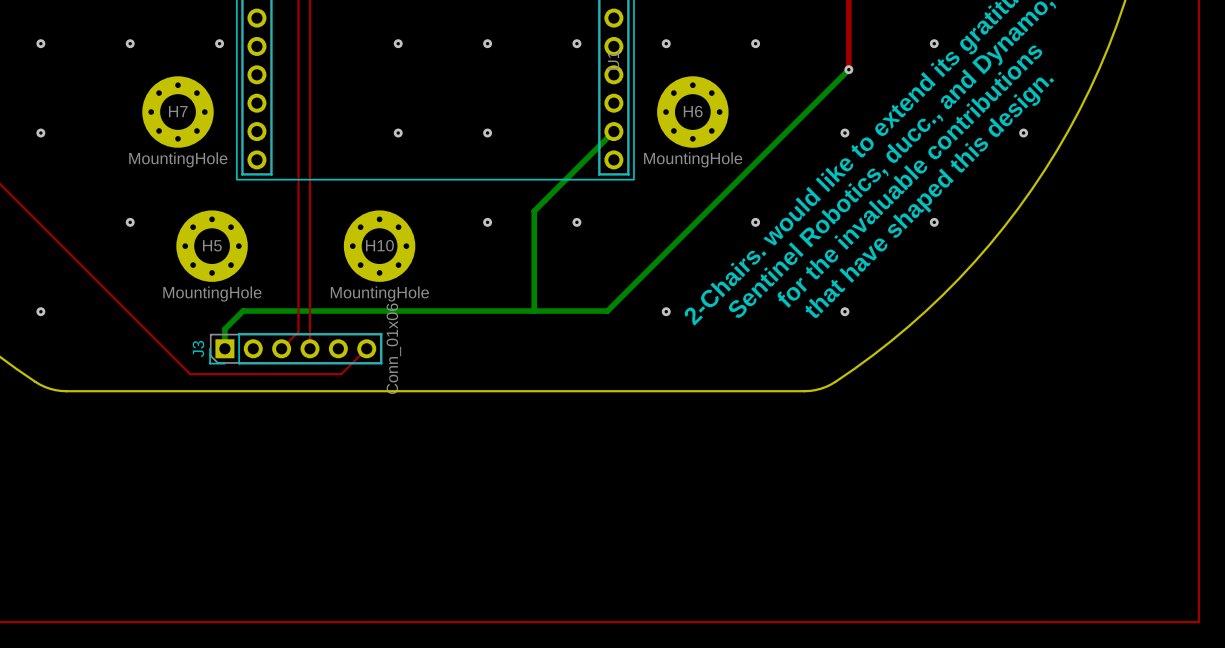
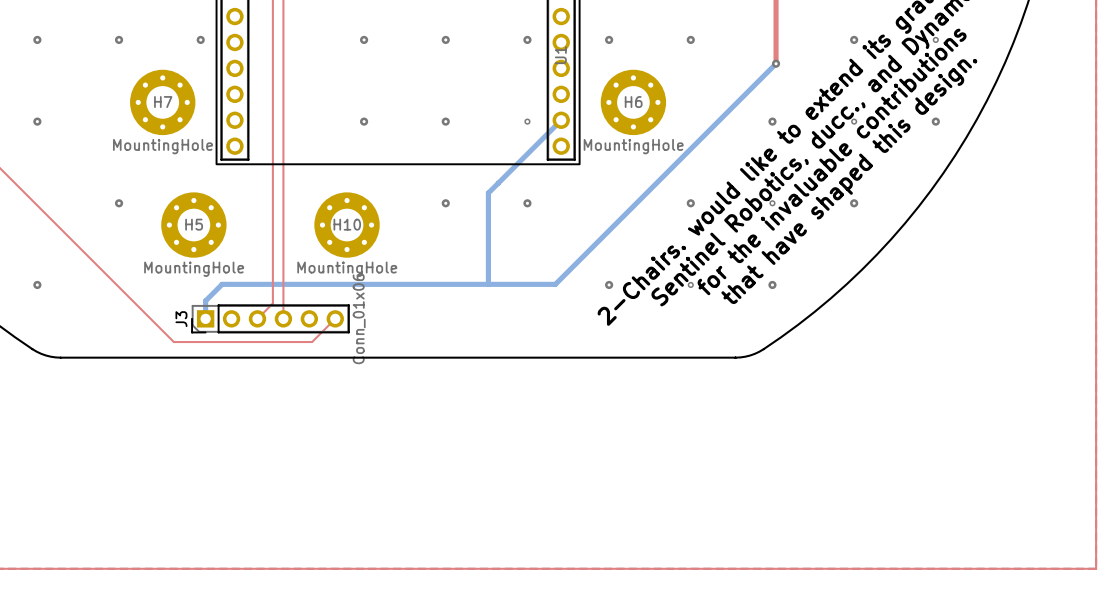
via: none -> (935, 39)
via: none -> (527, 121)
via: none -> (854, 121)
via: none -> (772, 203)
via: none -> (690, 284)

